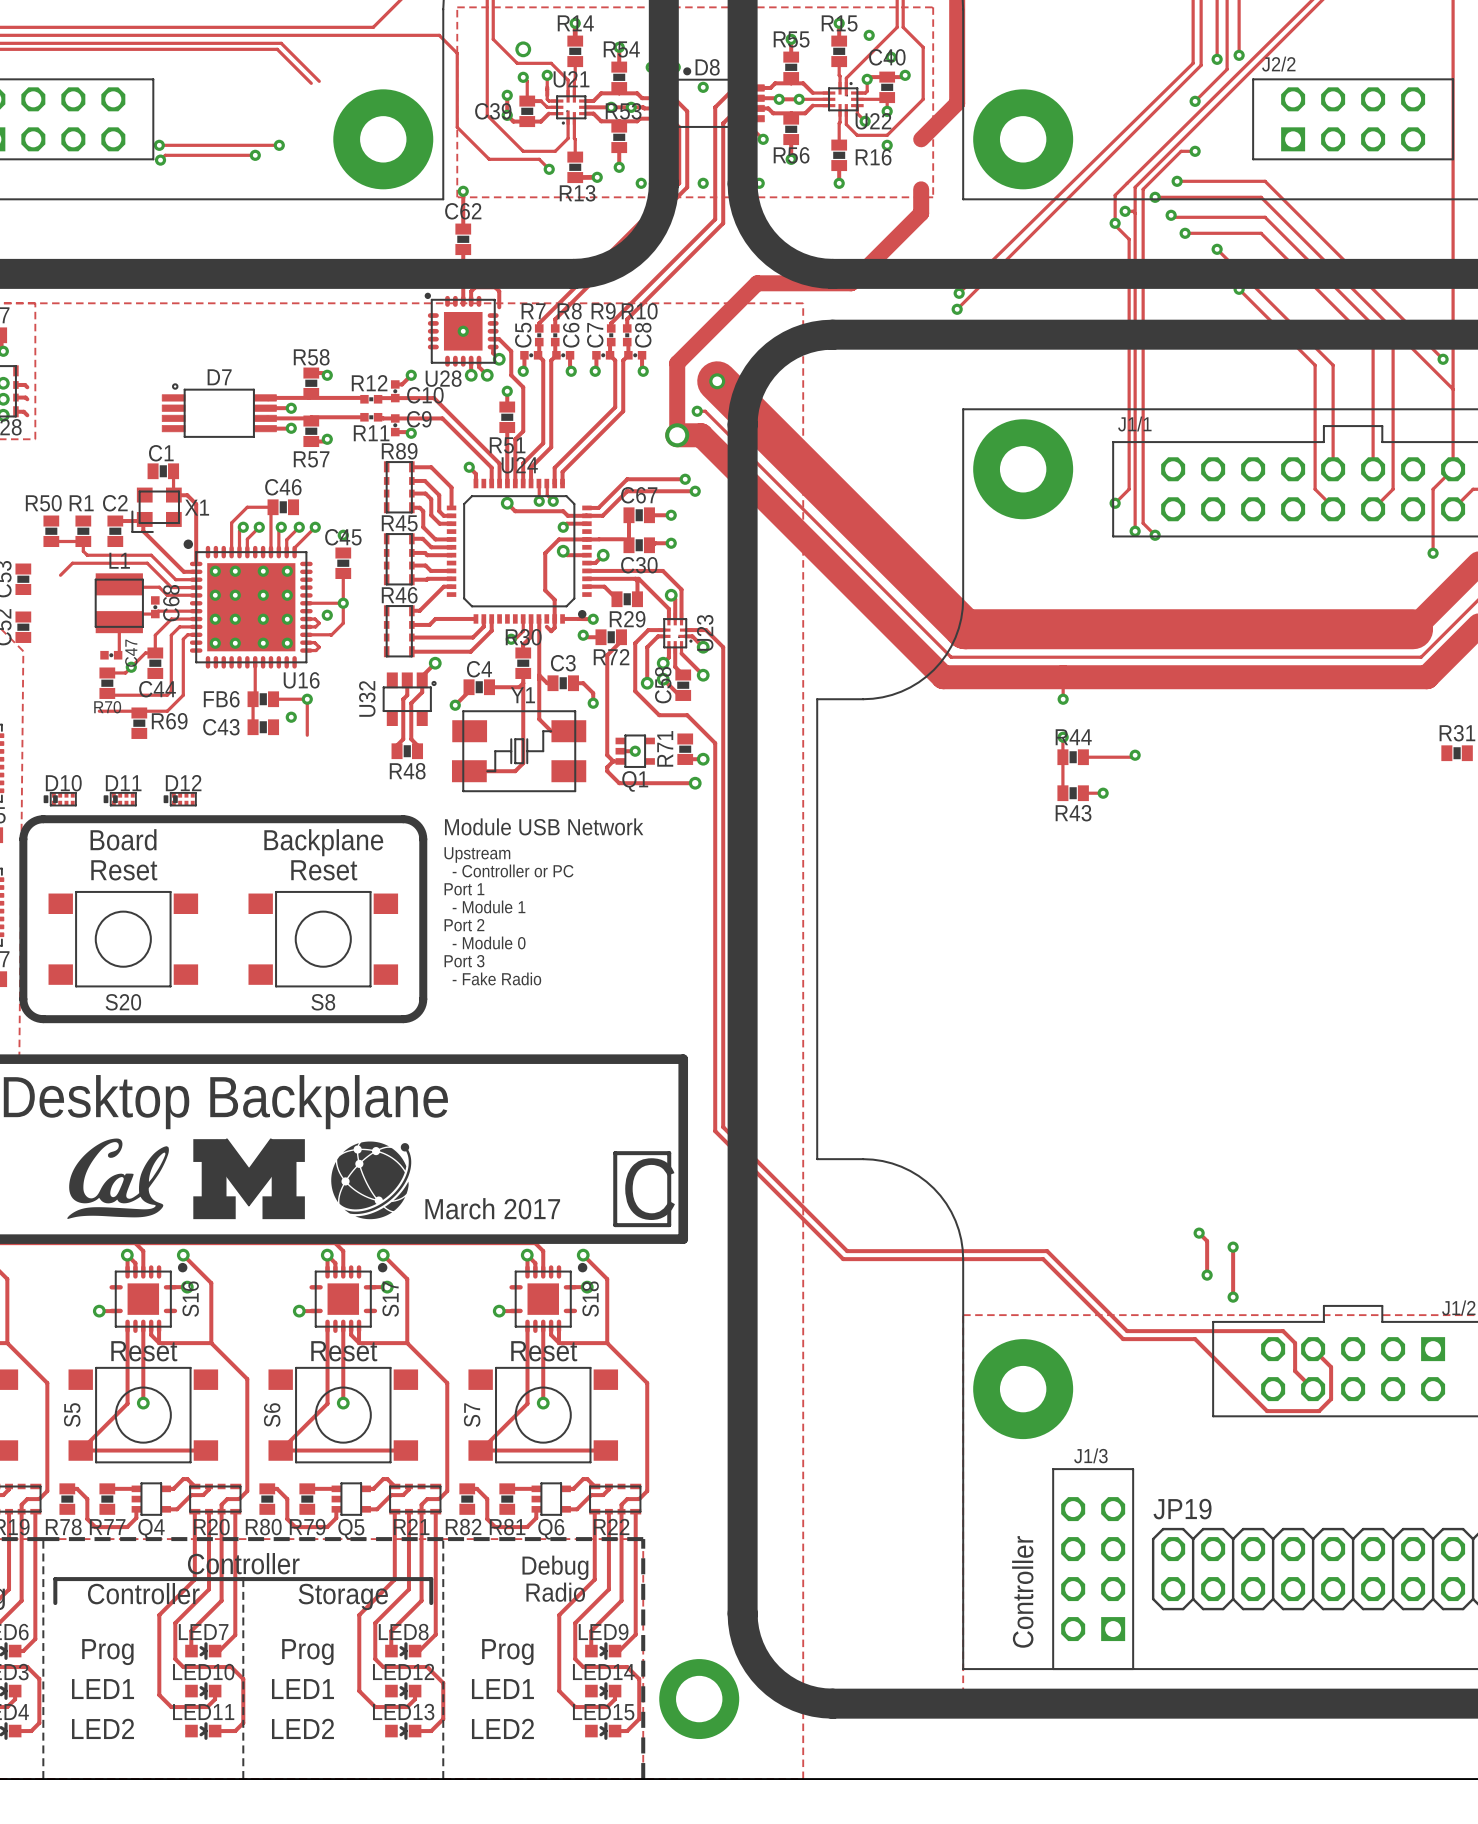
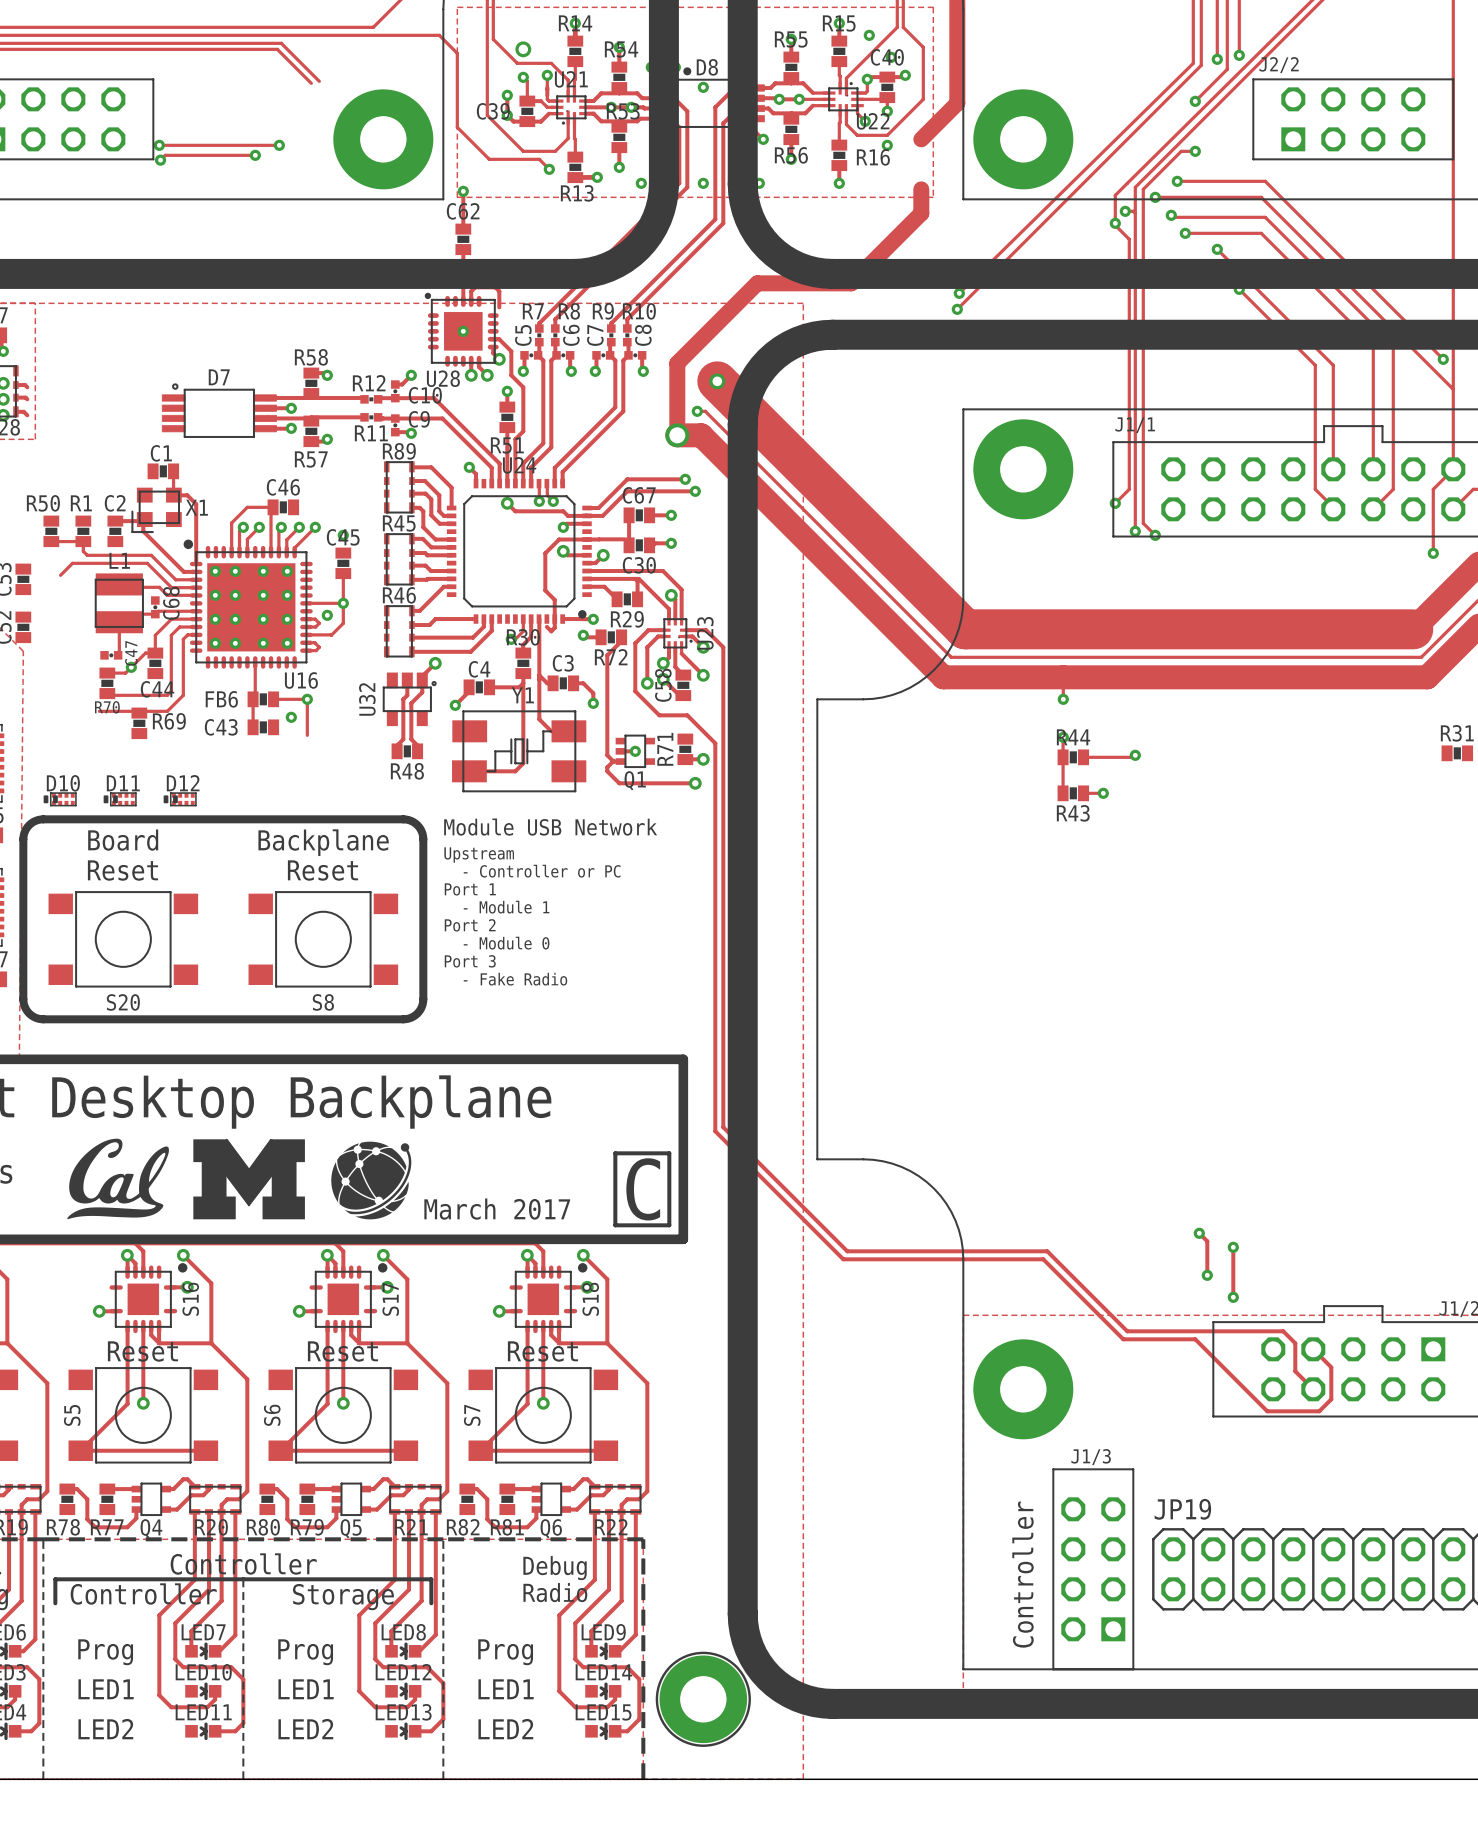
via: (699, 1699) -> none
part: none -> (703, 1699)

